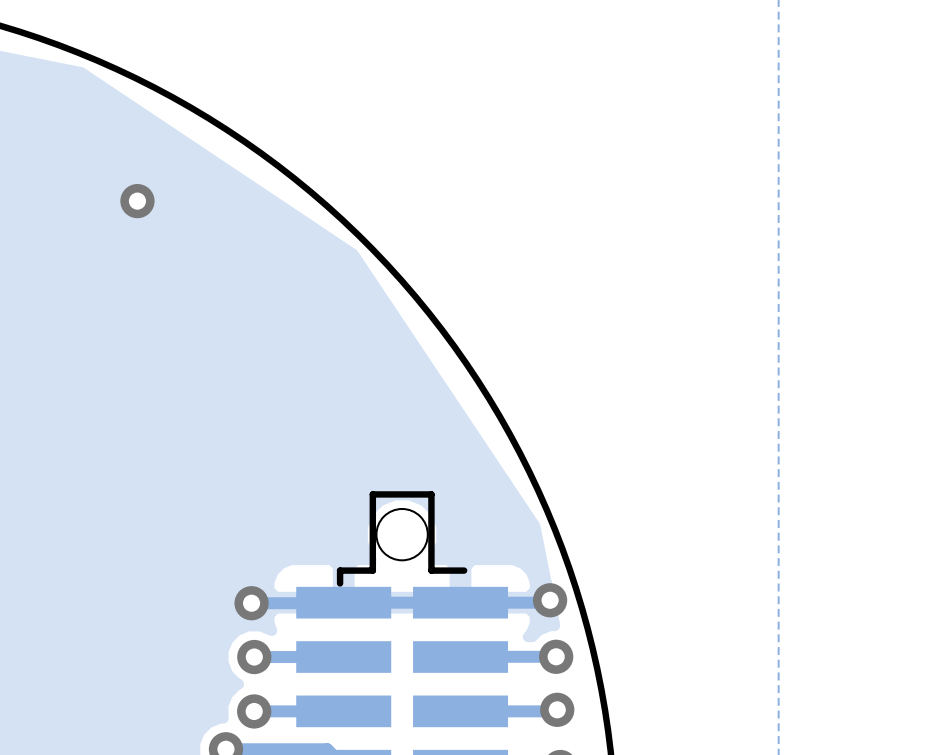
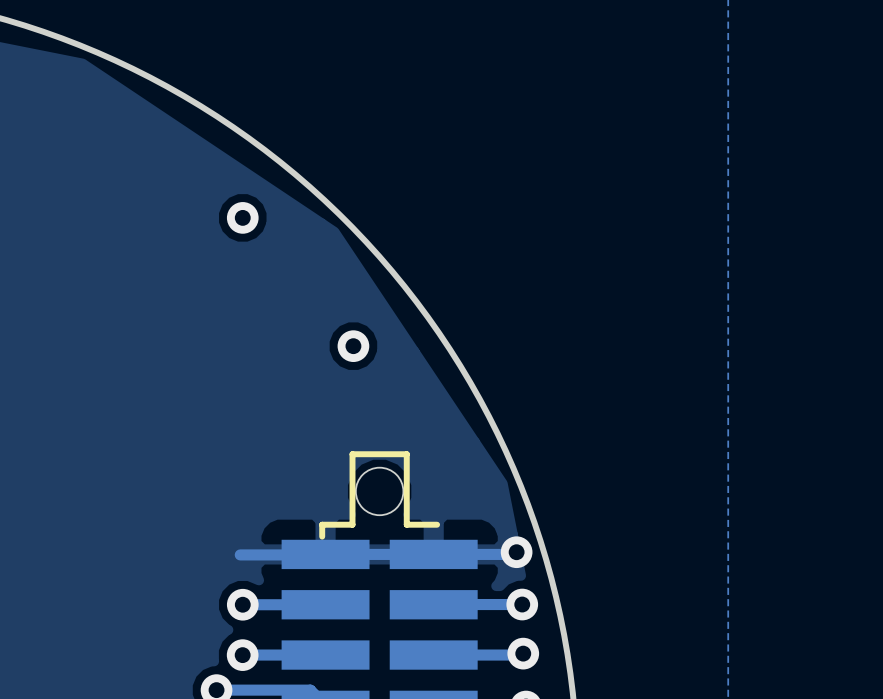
via position: (137, 201) -> (242, 217)
via: none -> (353, 346)
via: (251, 603) -> none

